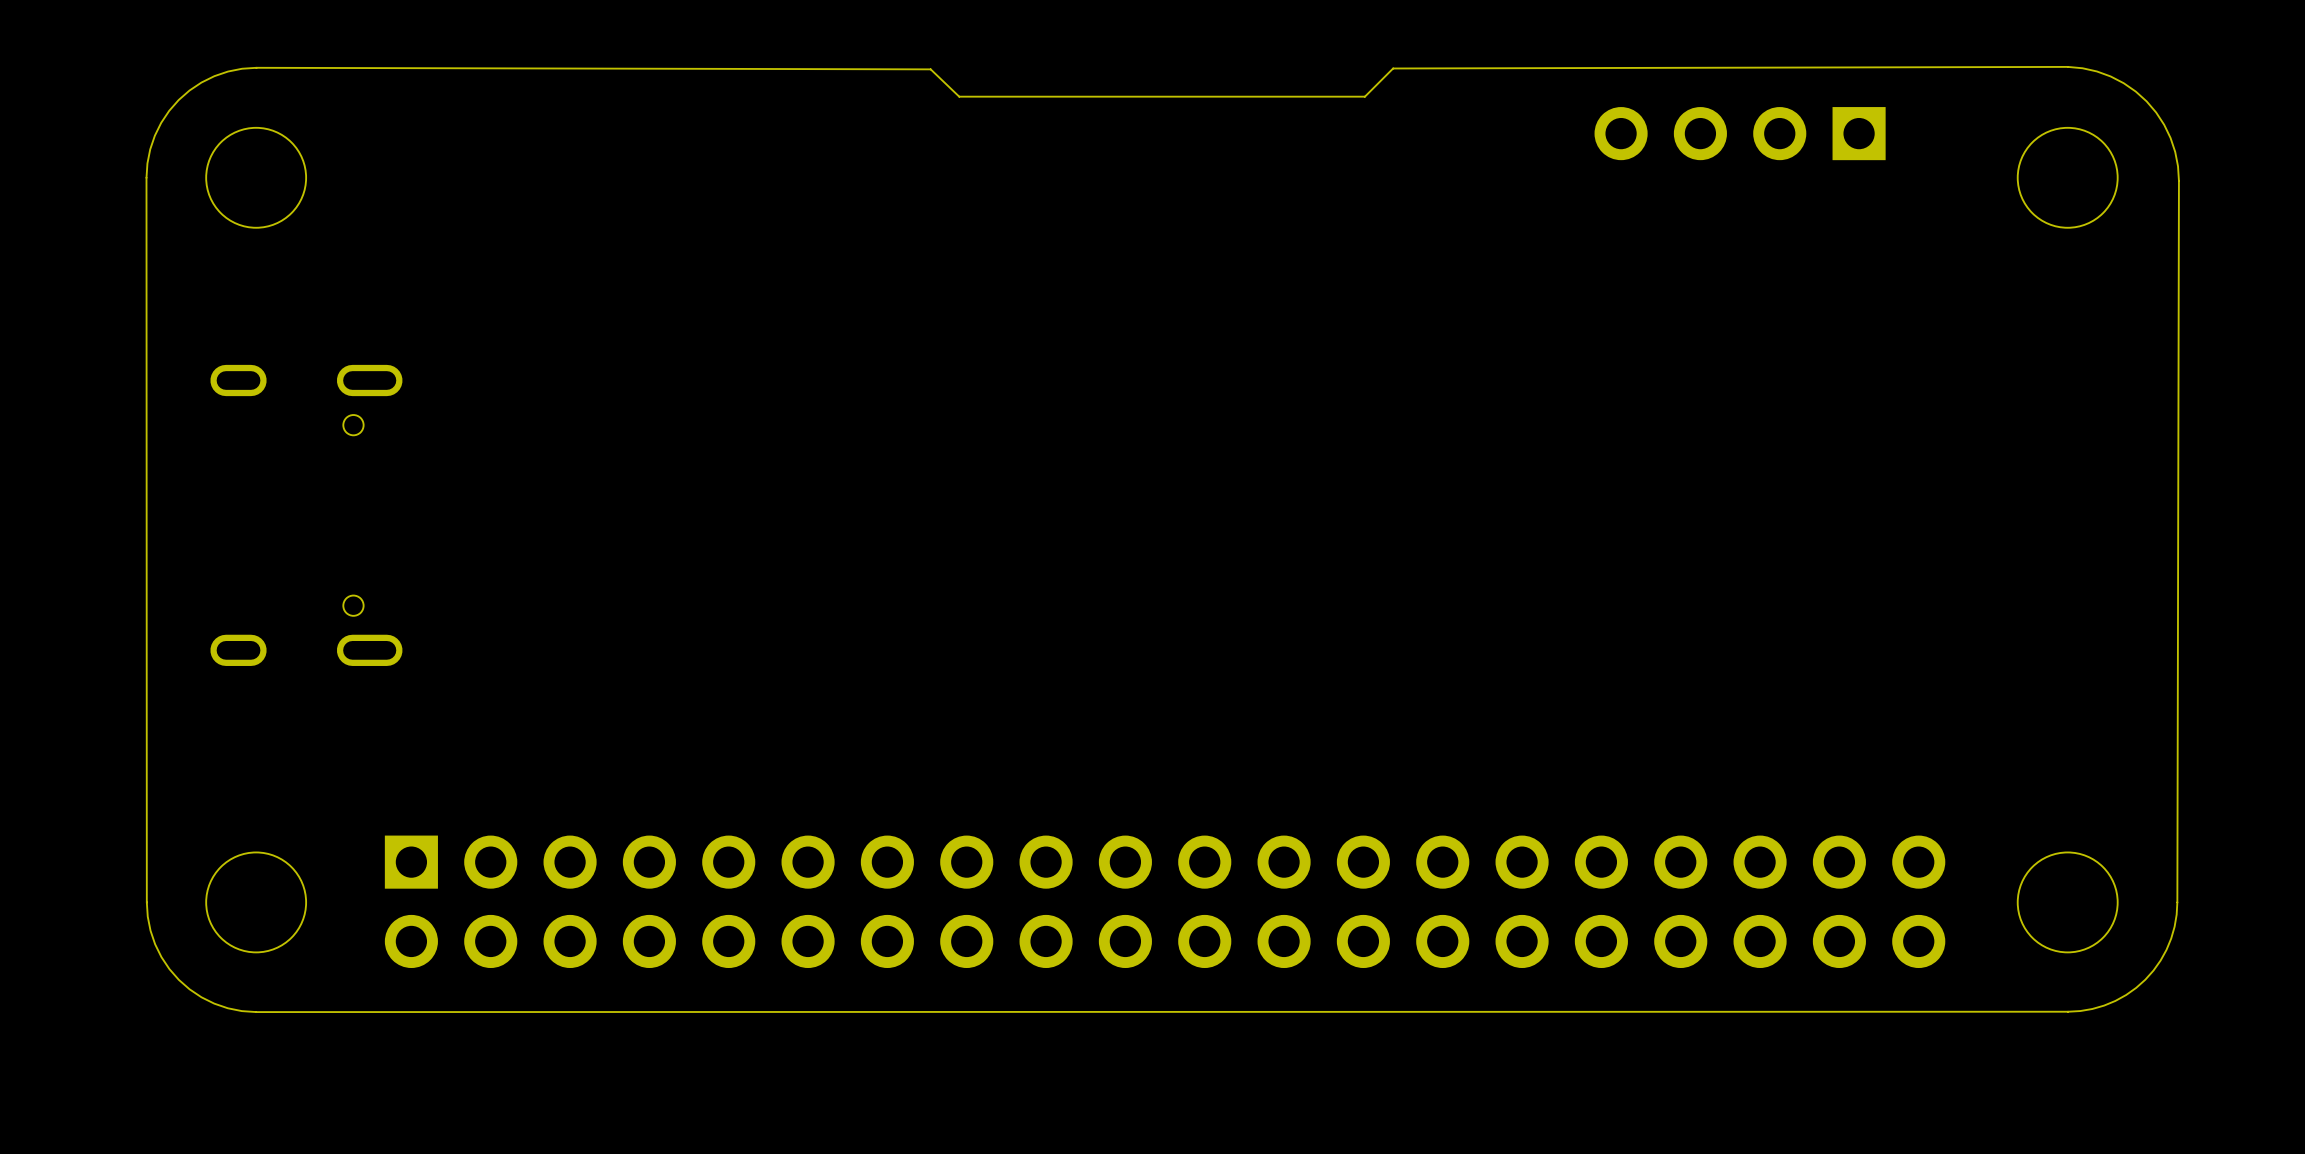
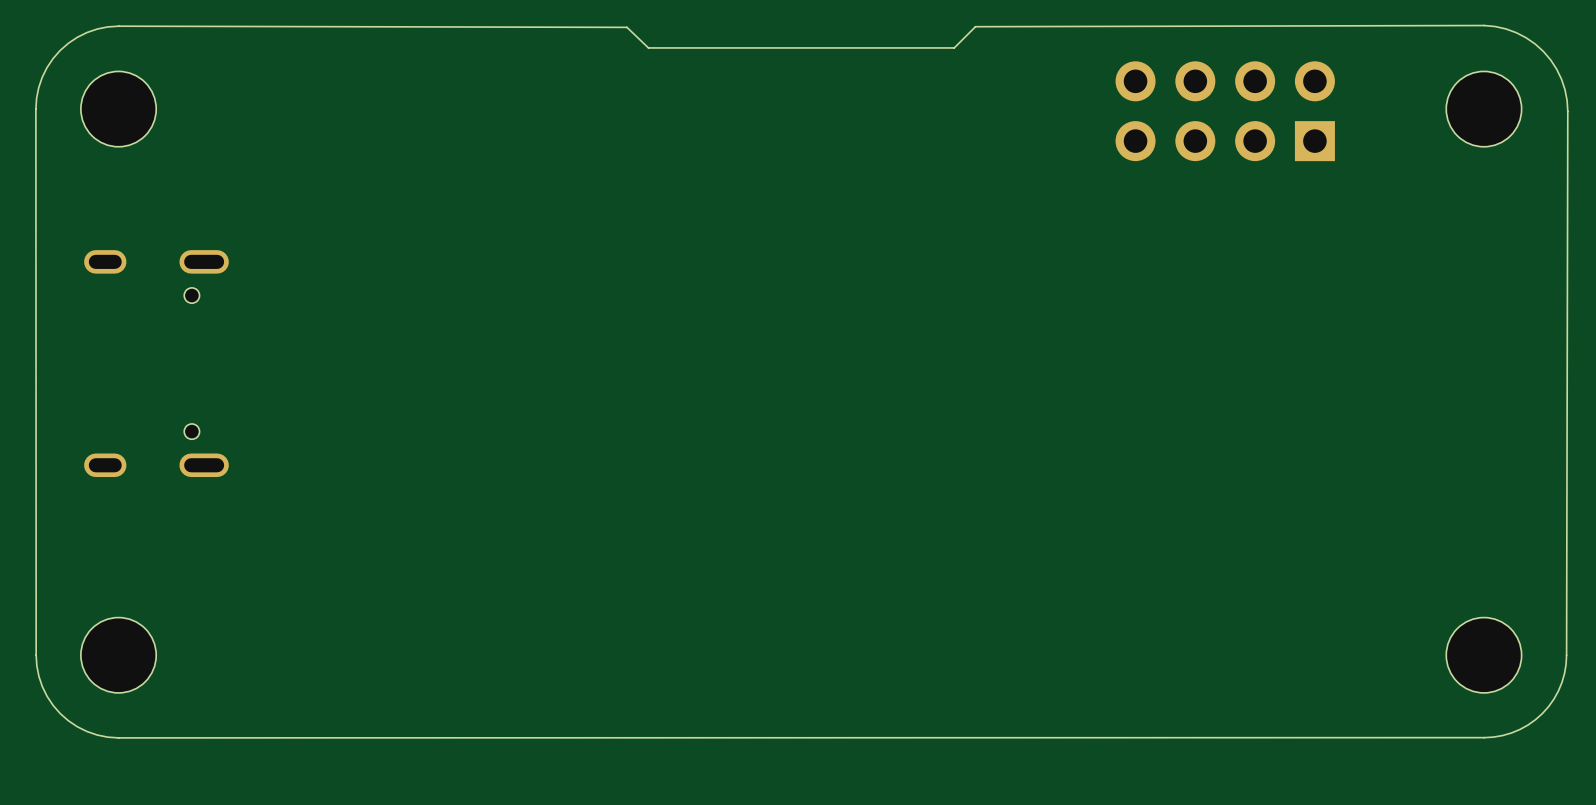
part: (1740, 133) -> none
part: none -> (1225, 111)
part: (1165, 901) -> none

